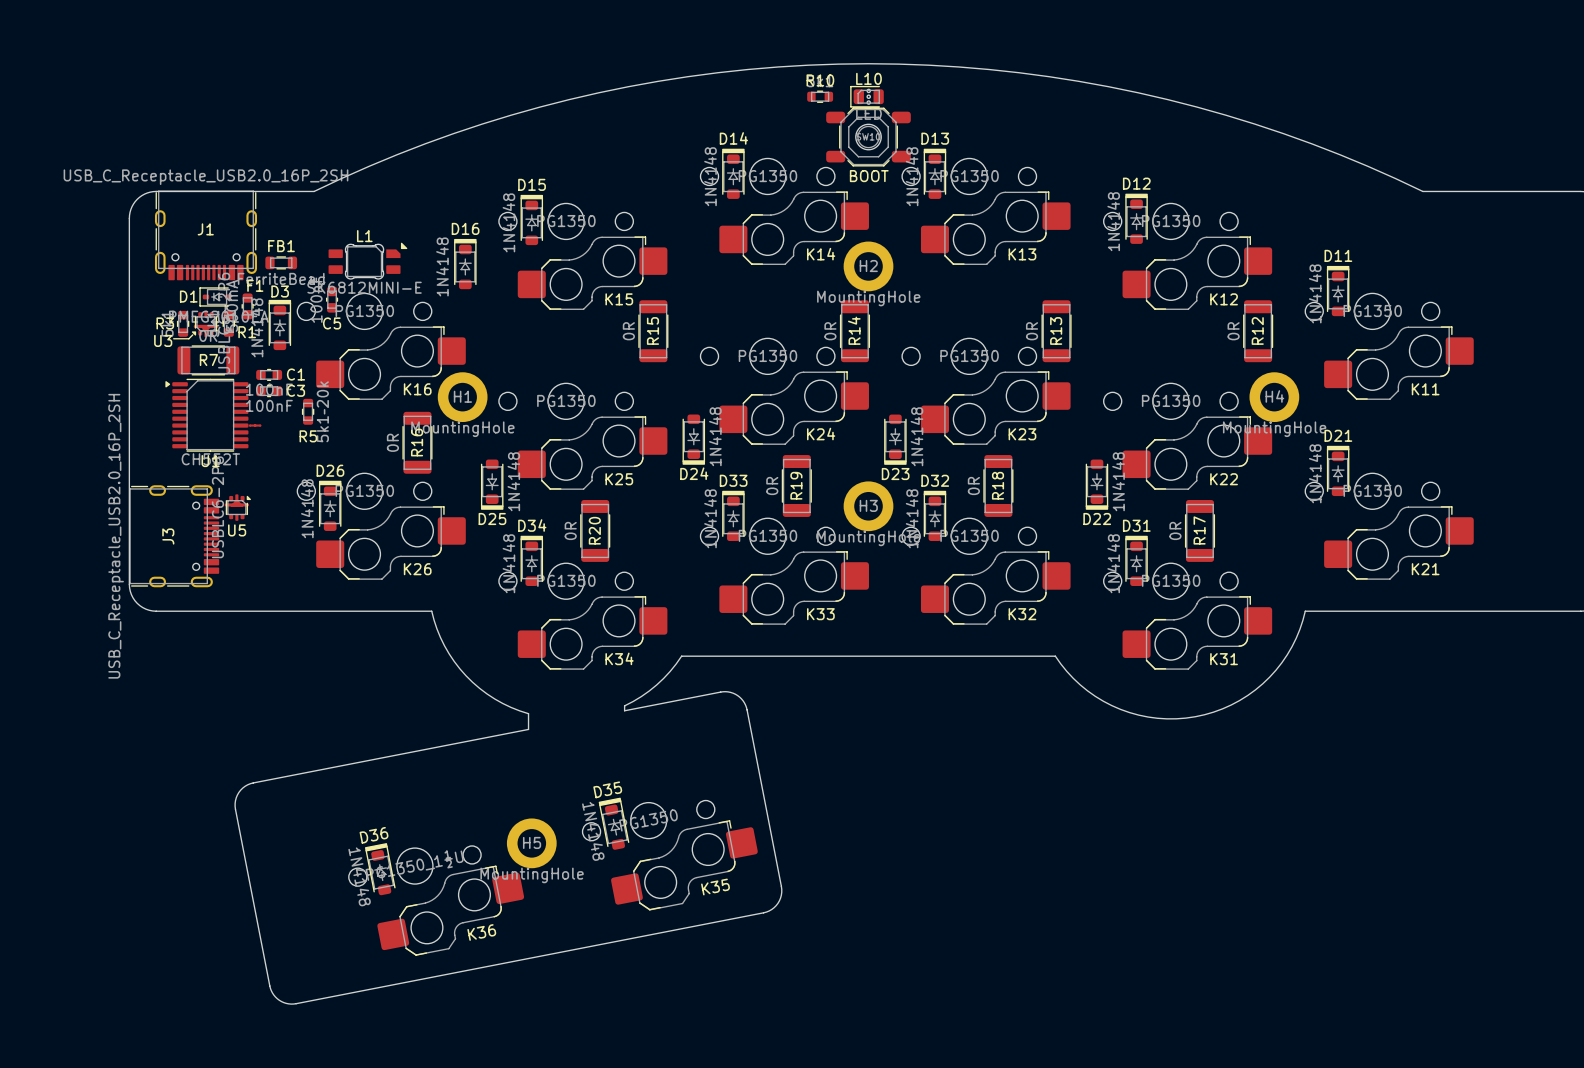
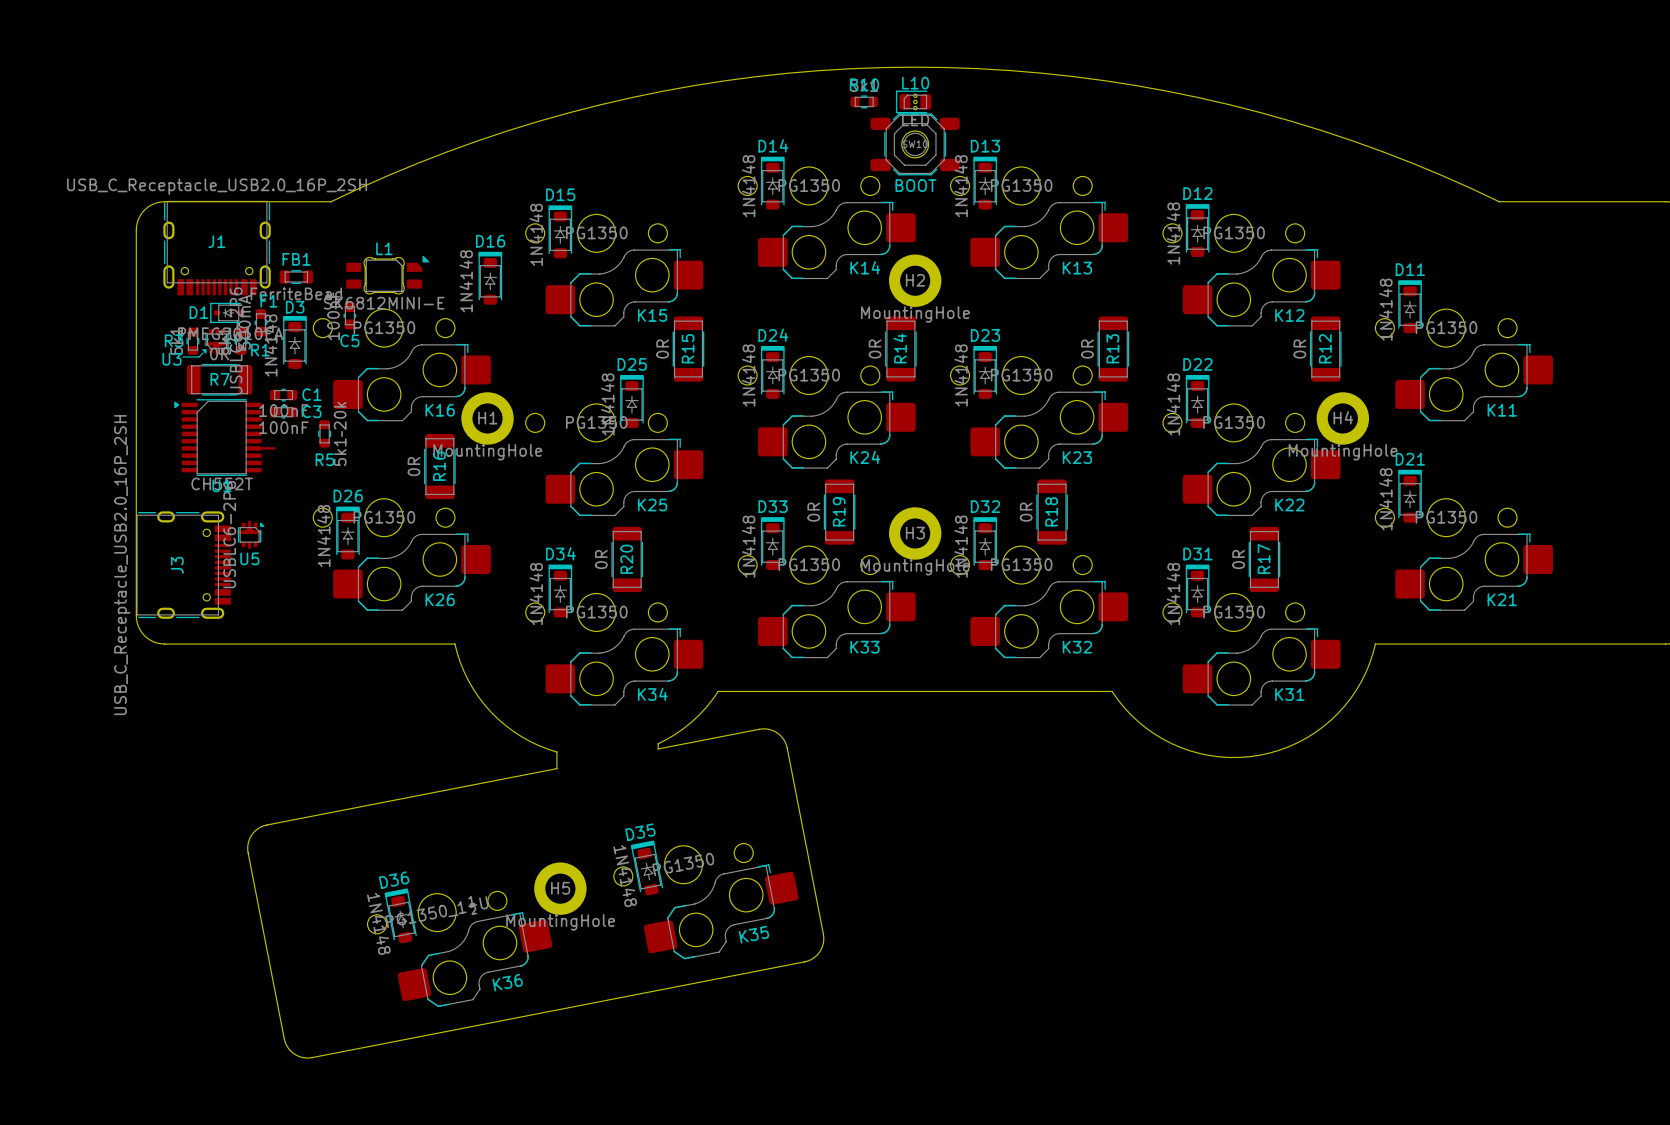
D24 rotation: 0° (693, 439) -> 180° (772, 372)
D24 position: (693, 439) -> (772, 372)
D23 rotation: 0° (895, 439) -> 180° (985, 372)
D23 position: (895, 439) -> (985, 372)
D25 rotation: 0° (492, 484) -> 180° (631, 401)
D25 position: (492, 484) -> (631, 401)
D22 rotation: 0° (1096, 484) -> 180° (1197, 401)
D22 position: (1096, 484) -> (1197, 401)

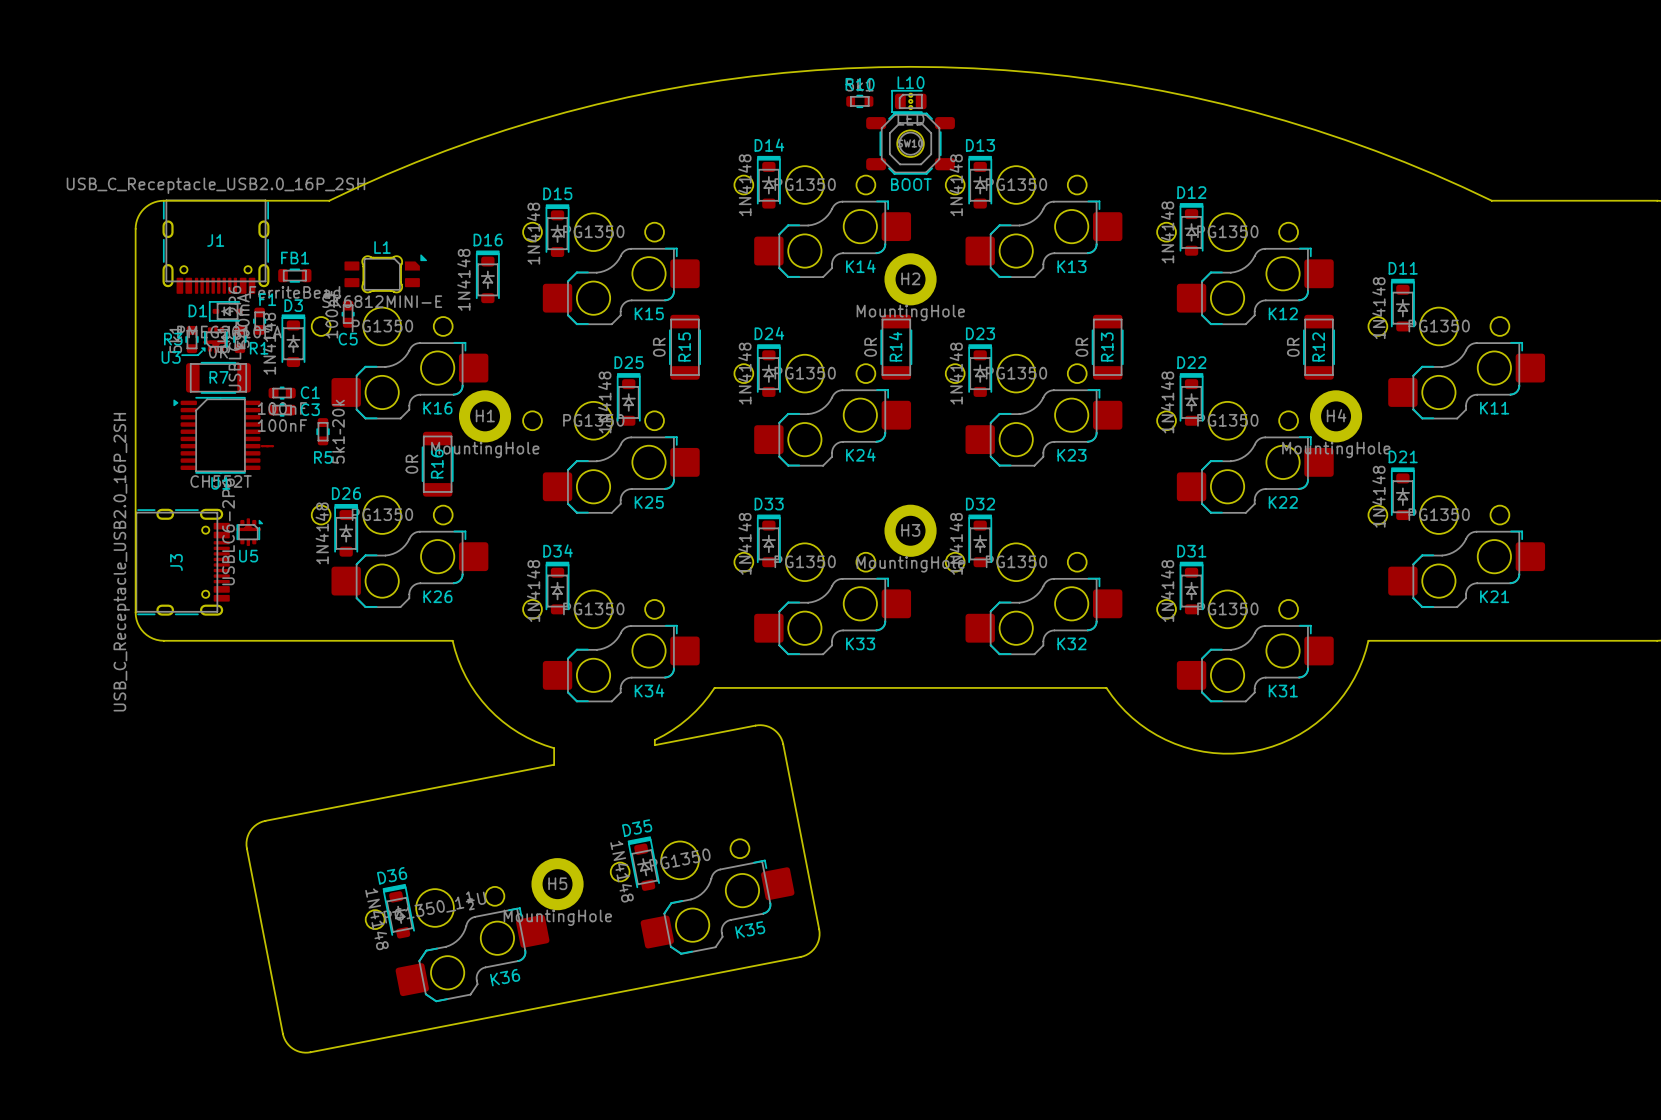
R19: 0R (839, 512) -> none
R18: 0R (1052, 512) -> none
R20: 0R (627, 559) -> none
R17: 0R (1264, 559) -> none

